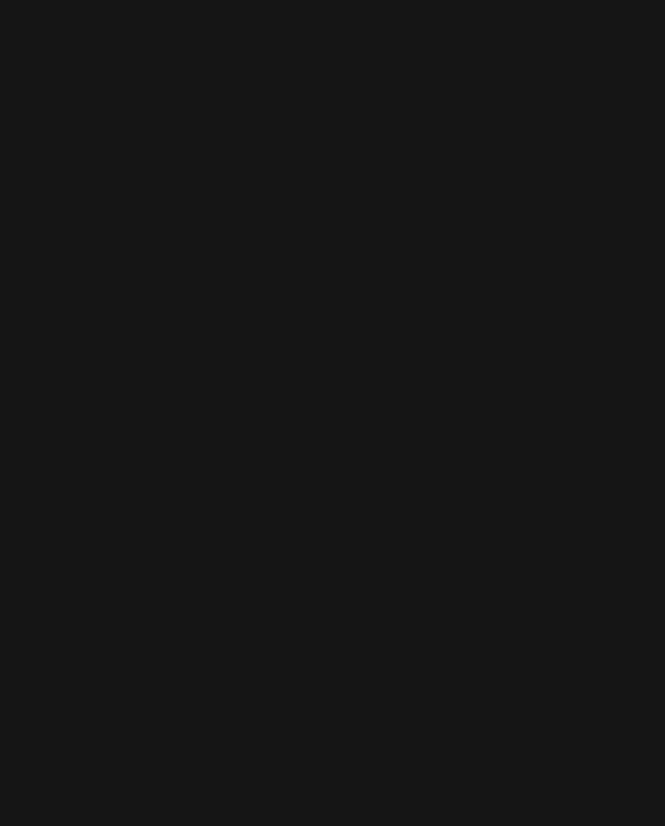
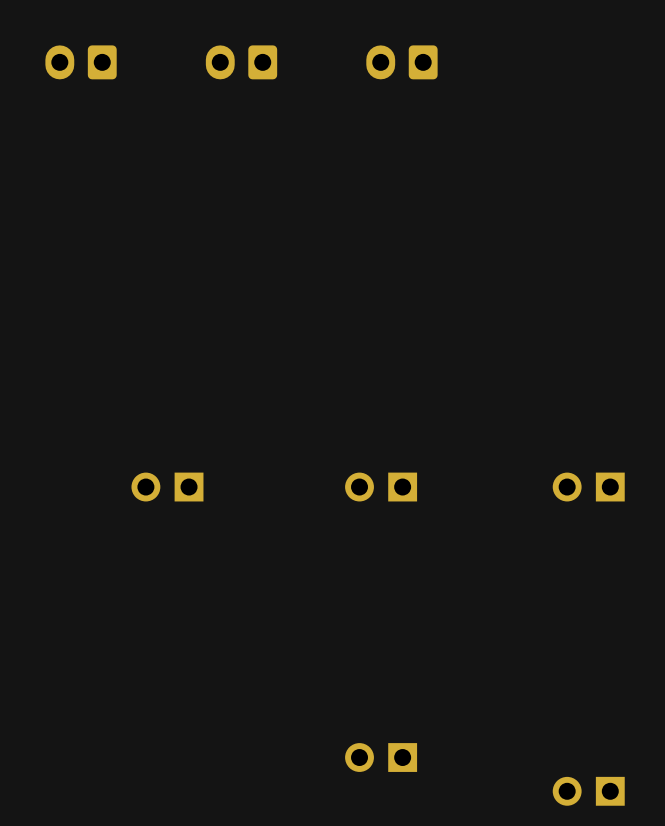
part: none -> (81, 62)
part: none -> (241, 62)
part: none -> (401, 62)
part: none -> (167, 487)
part: none -> (381, 487)
part: none -> (588, 487)
part: none -> (381, 757)
part: none -> (588, 791)

